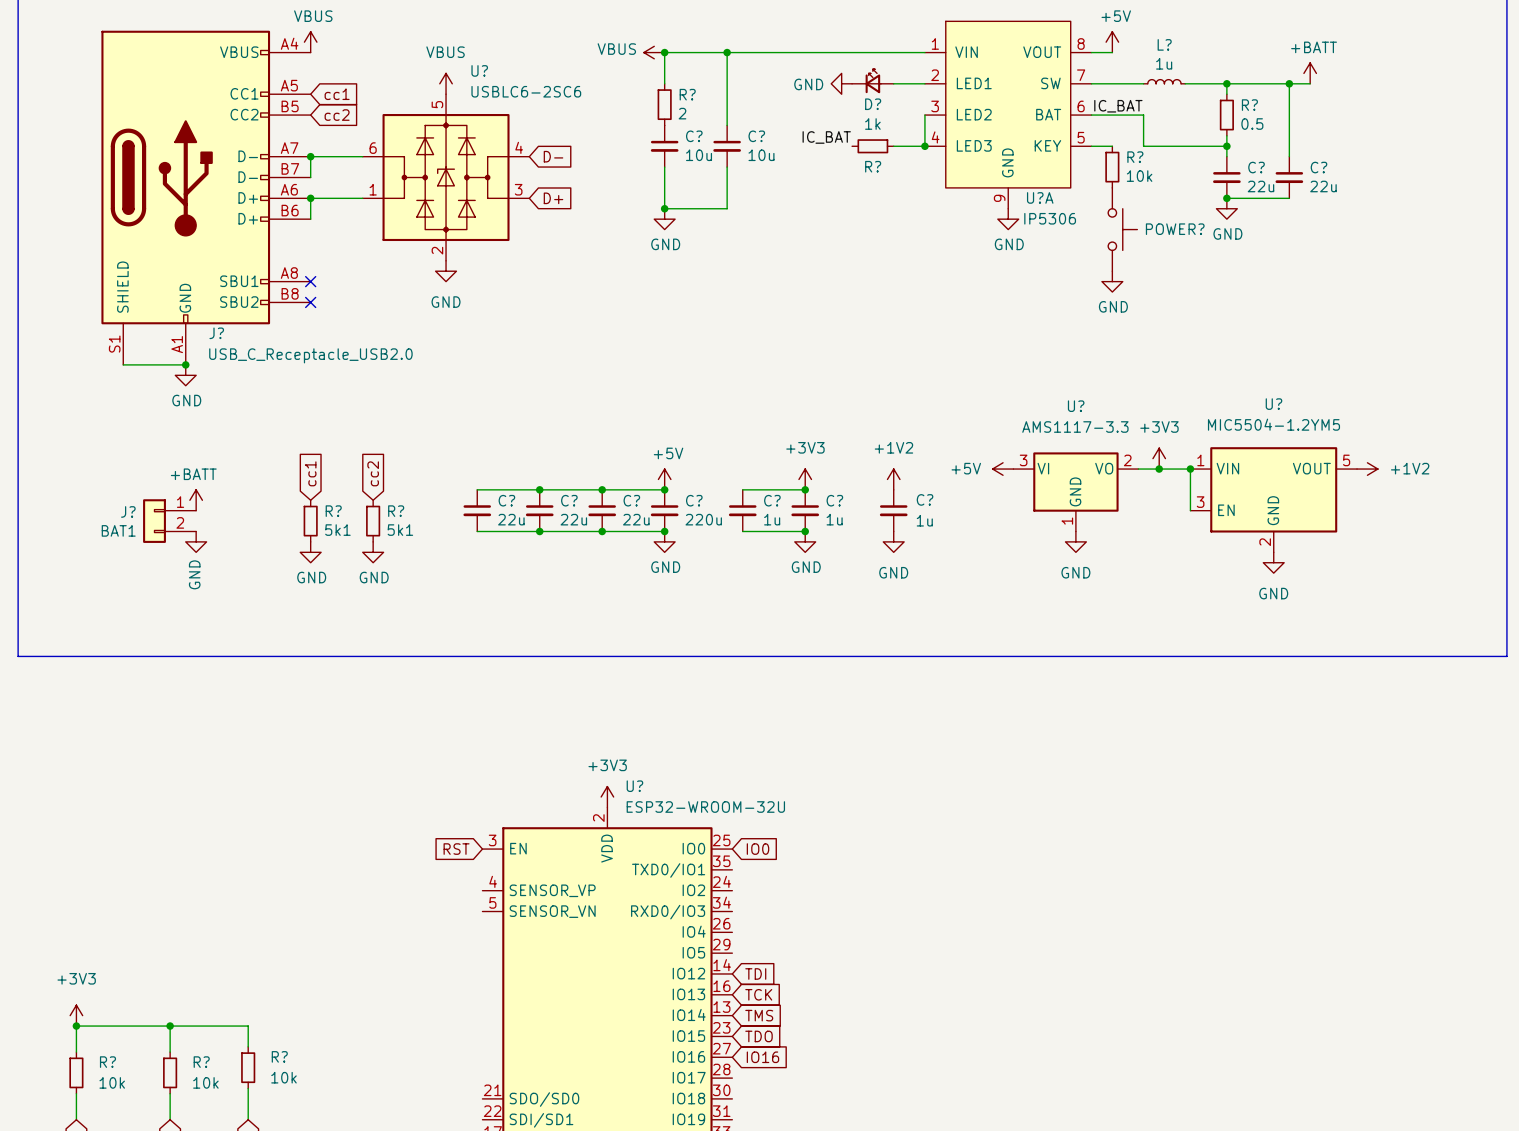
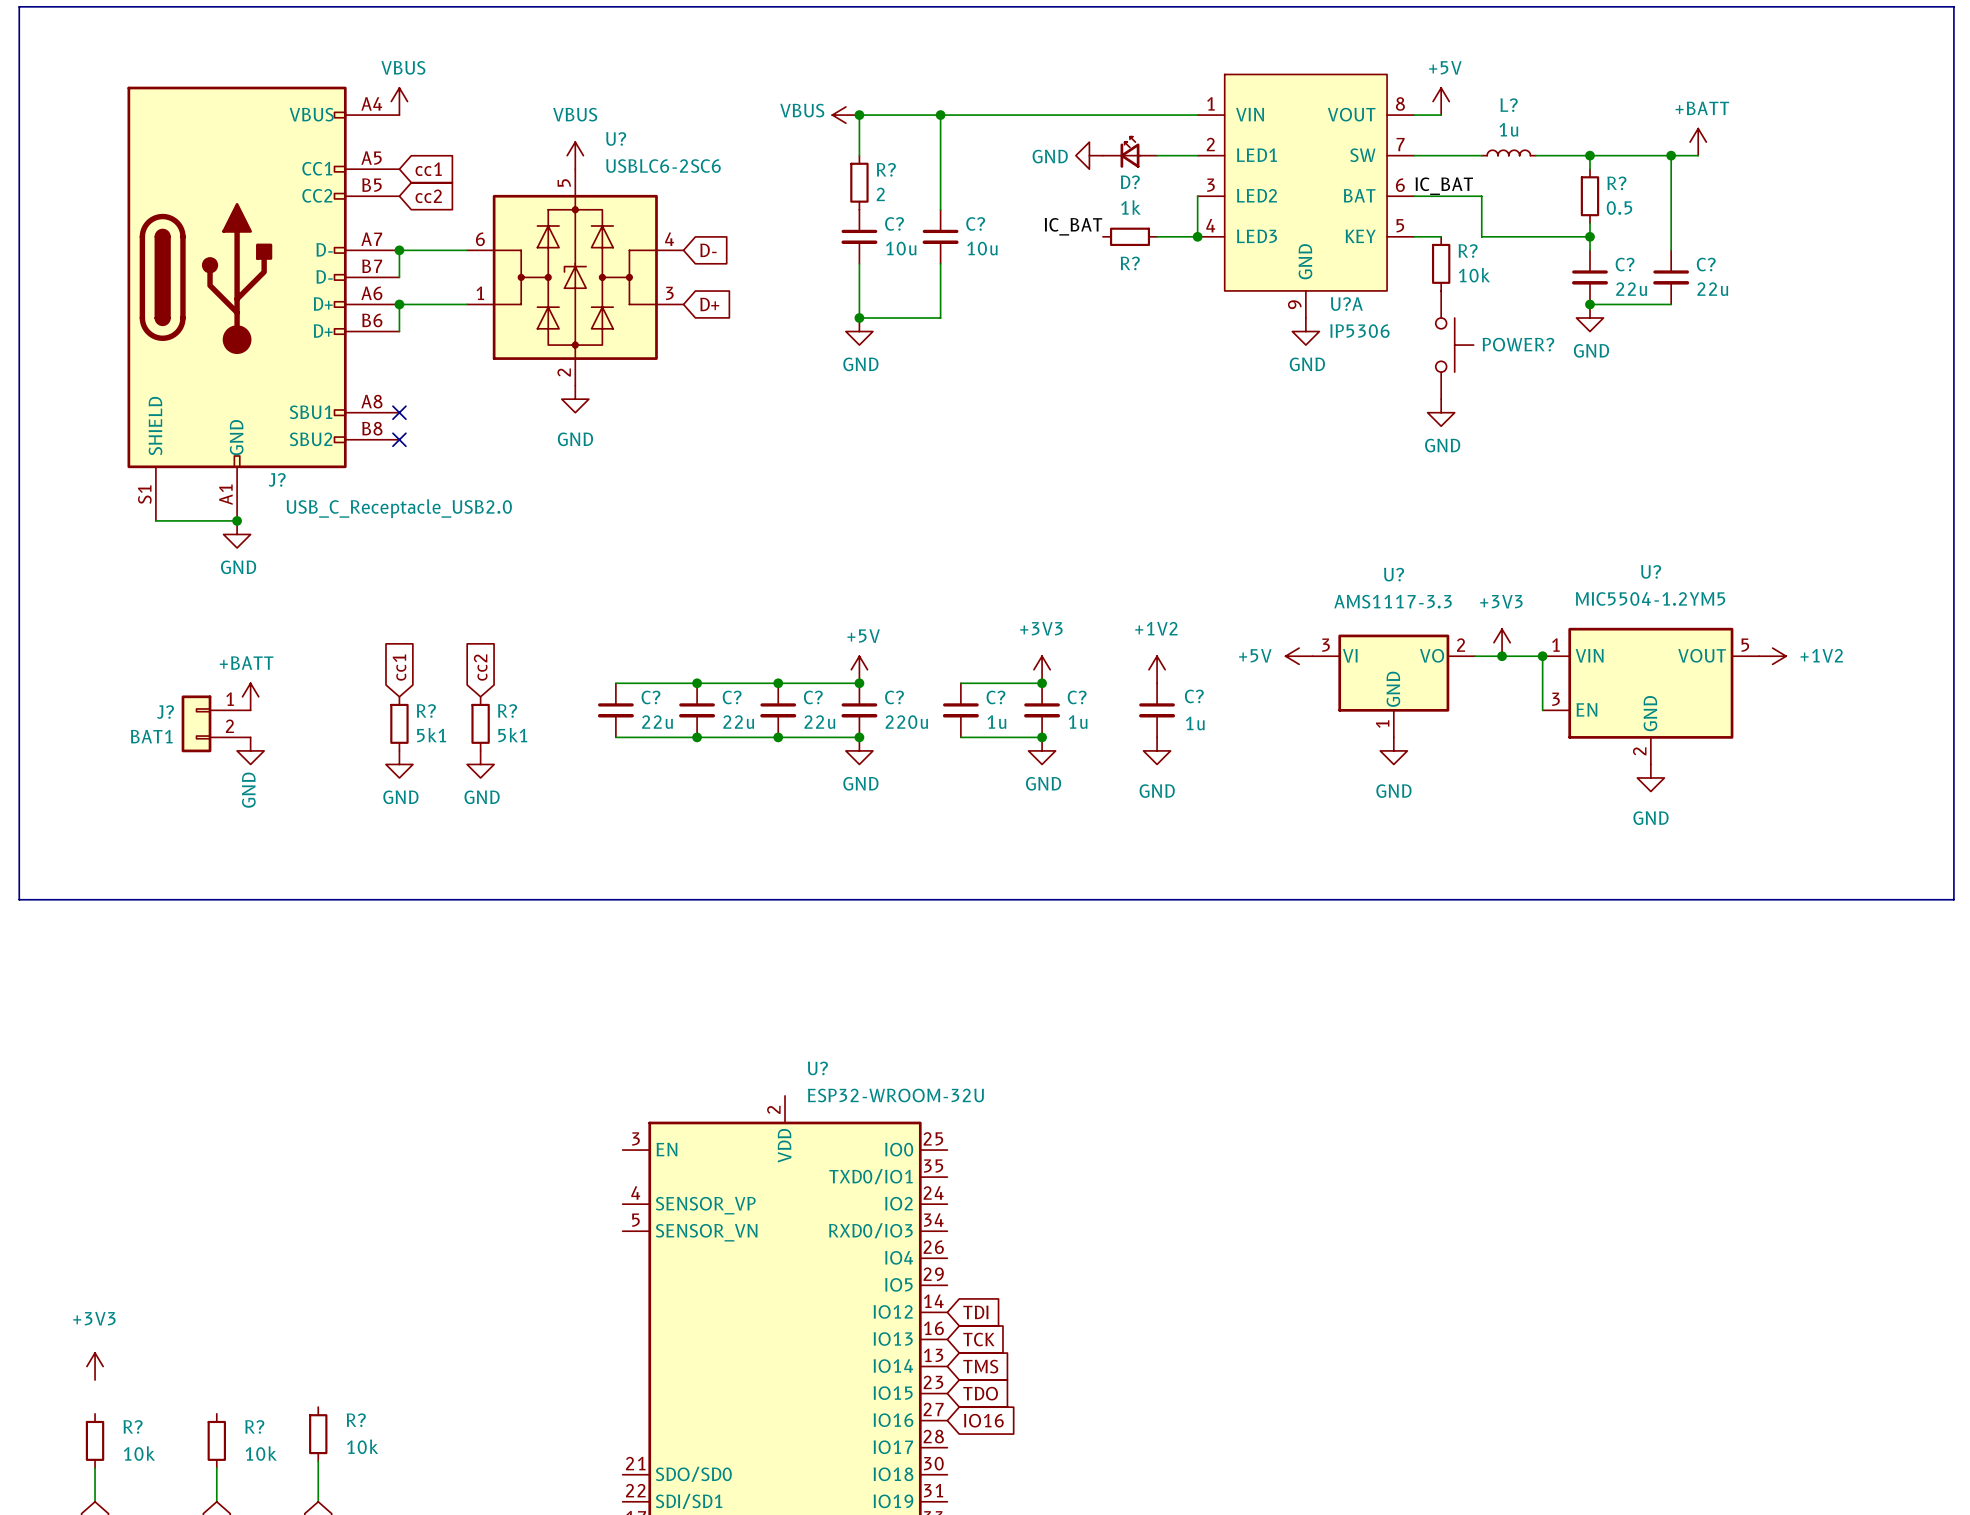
power symbol: +3V3 (607, 796) -> none
global label: RST (456, 849) -> none
global label: IO0 (758, 849) -> none
junction: (76, 1026) -> none
wire: (170, 1026) (170, 1052) -> none
junction: (170, 1026) -> none
wire: (248, 1046) (248, 1026) (76, 1026) (76, 1052) -> none

